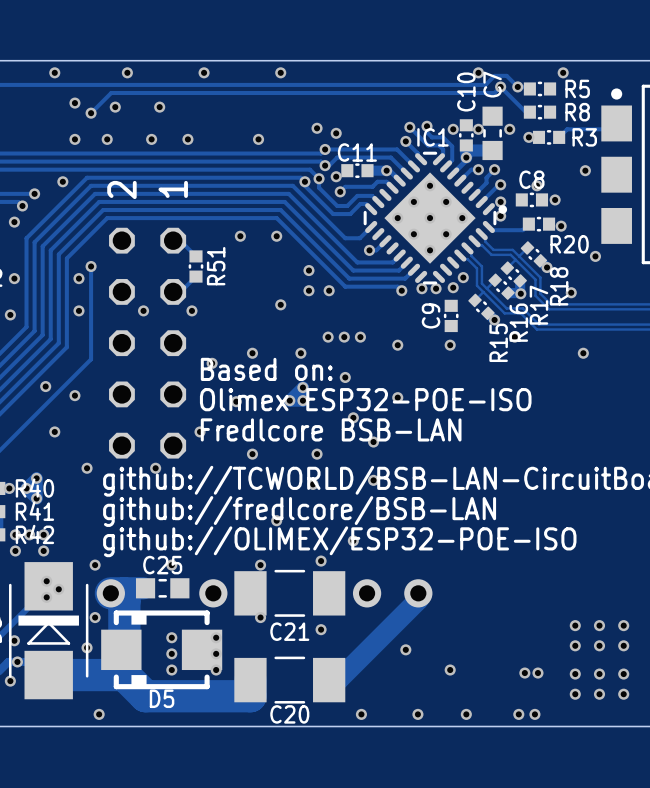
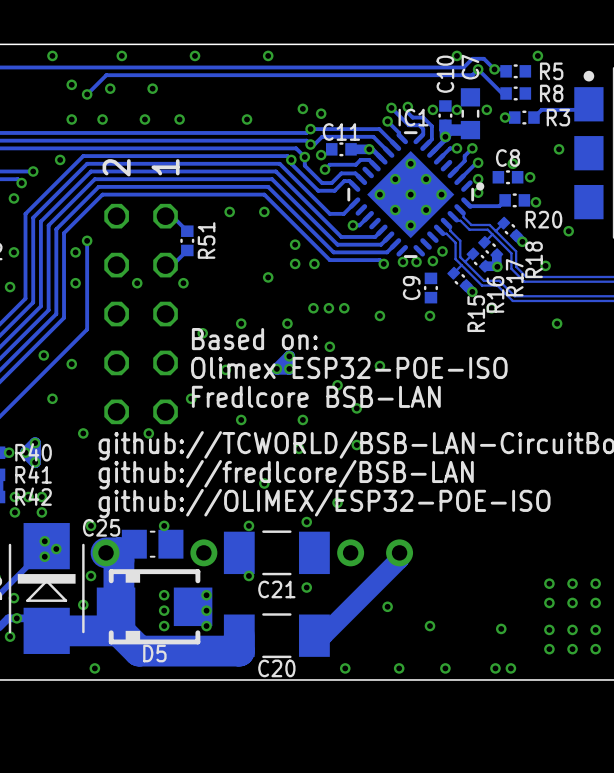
C25 name position: C25 (162, 565) -> C25 (101, 527)
C25 footprint: [135, 578, 190, 599] -> [121, 529, 184, 559]
via: (537, 673) -> none

